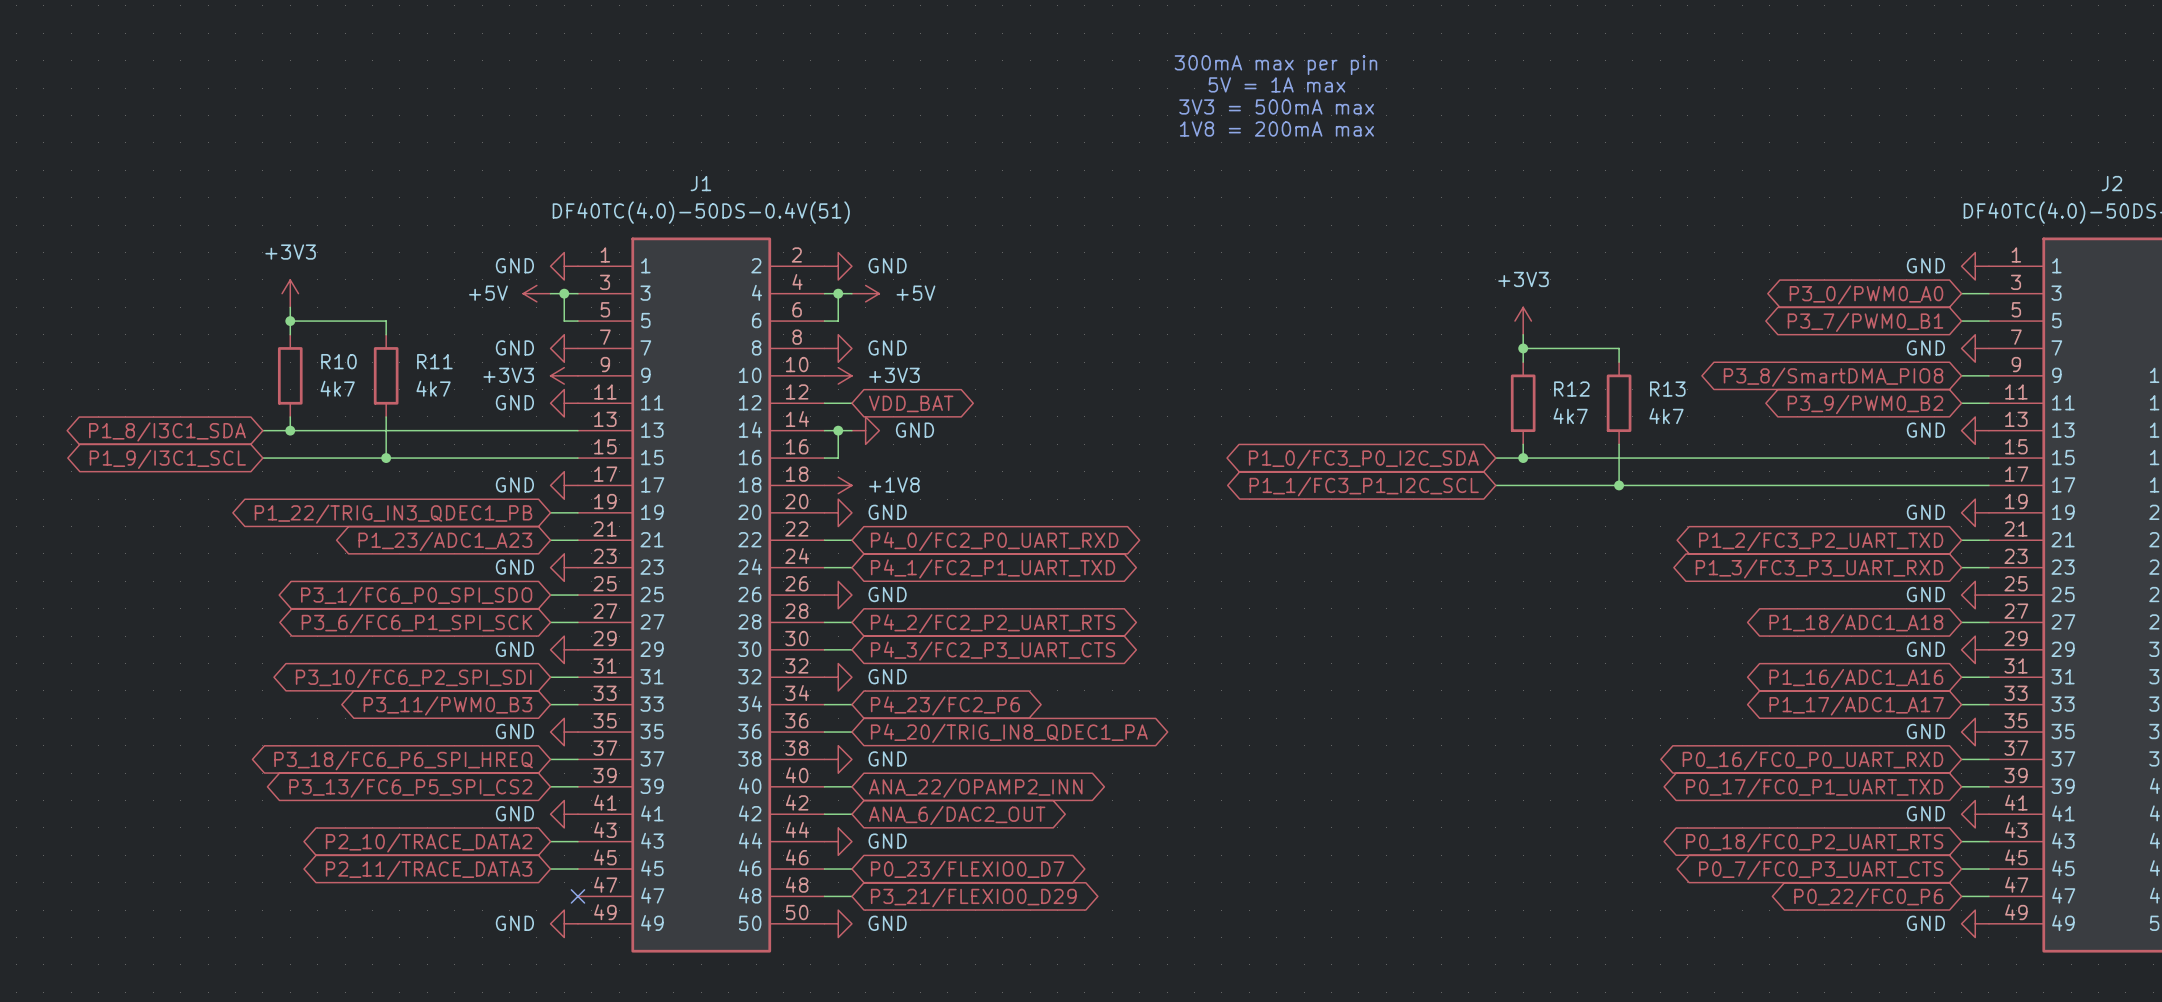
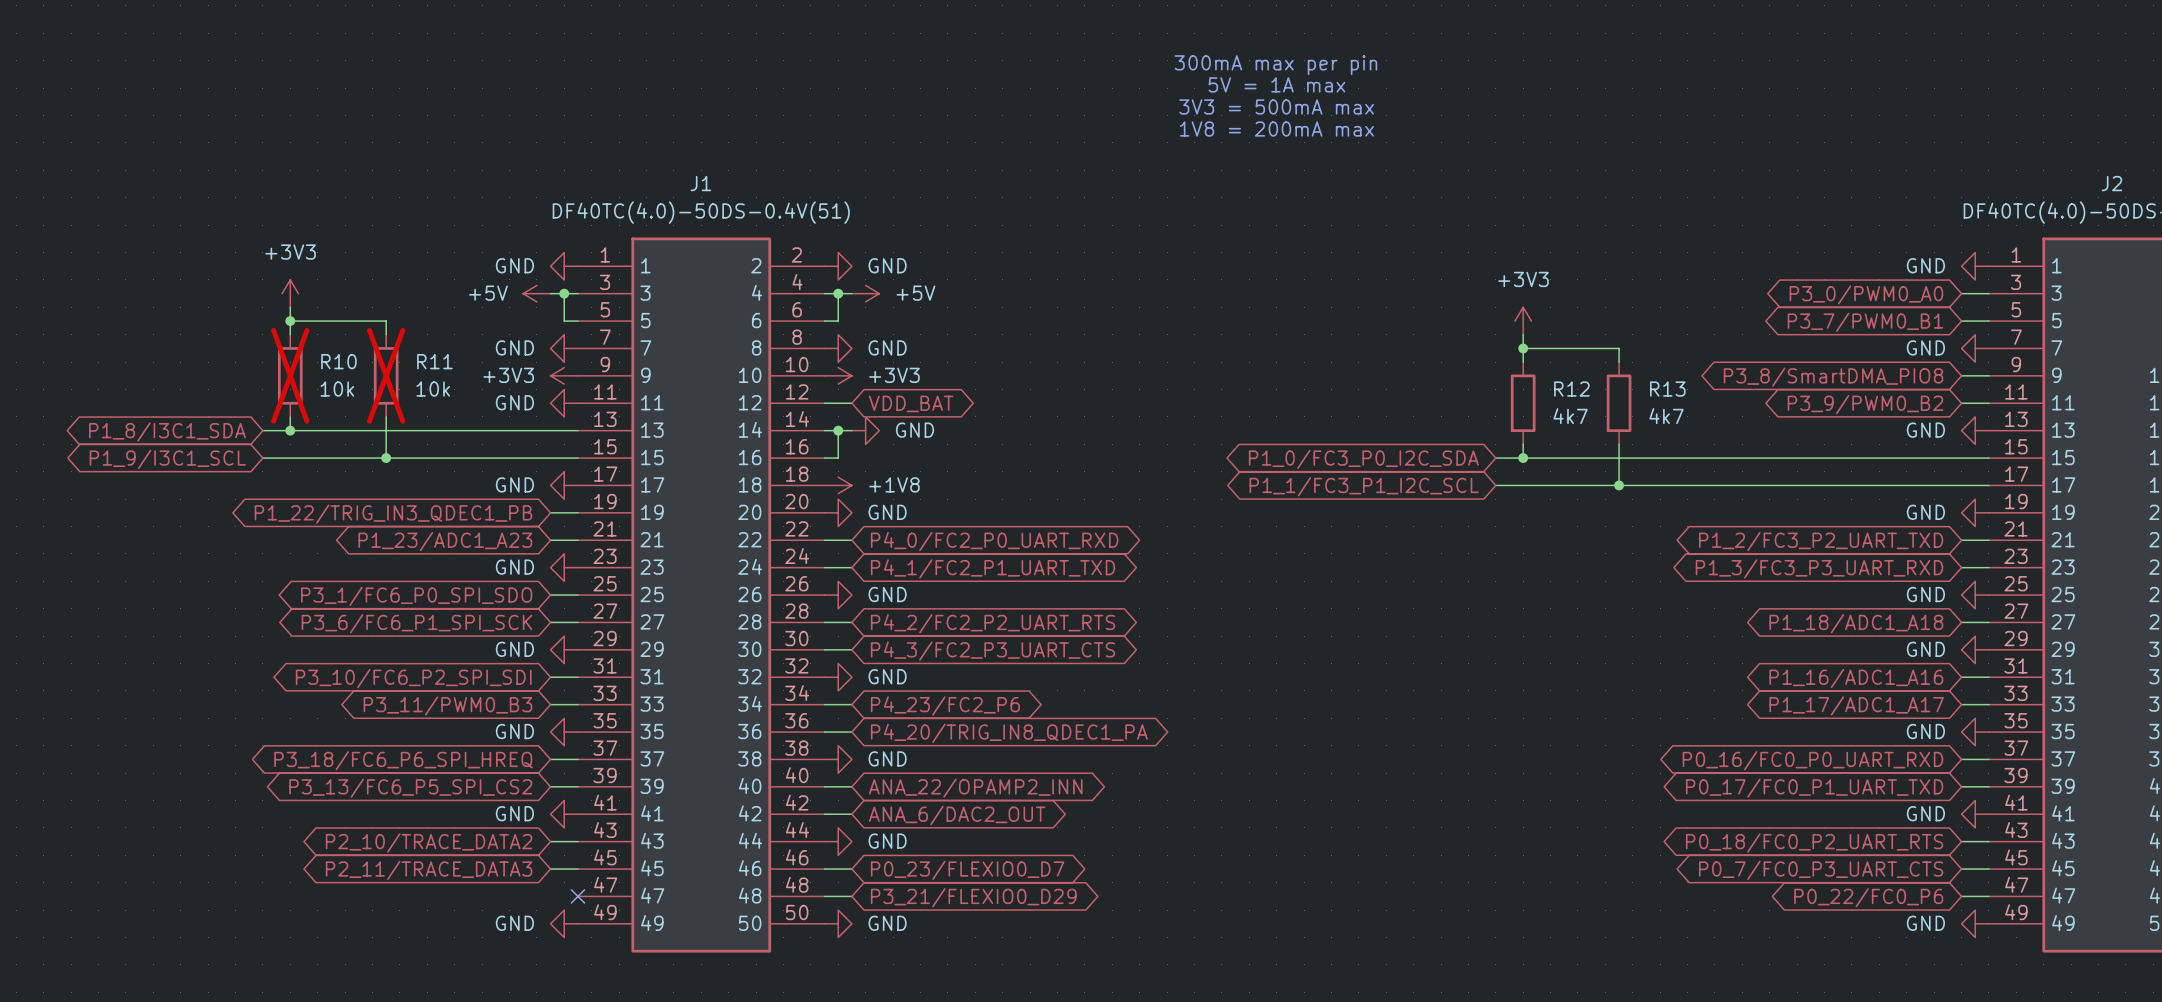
R10 do-not-place cross: none -> (290, 375)
R11 do-not-place cross: none -> (386, 375)
R10 value: 4k7 (337, 388) -> 10k (337, 389)
R11 value: 4k7 (433, 388) -> 10k (433, 389)

